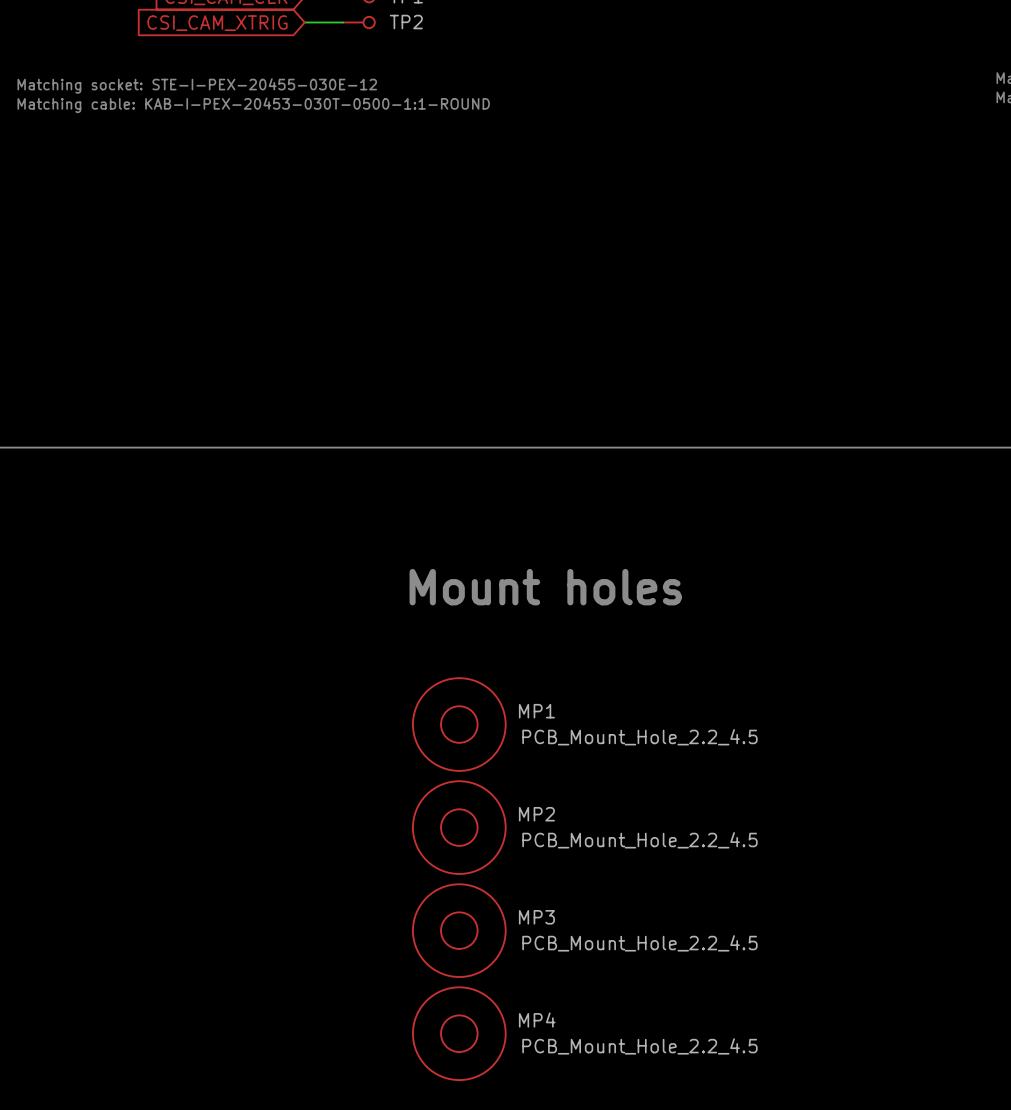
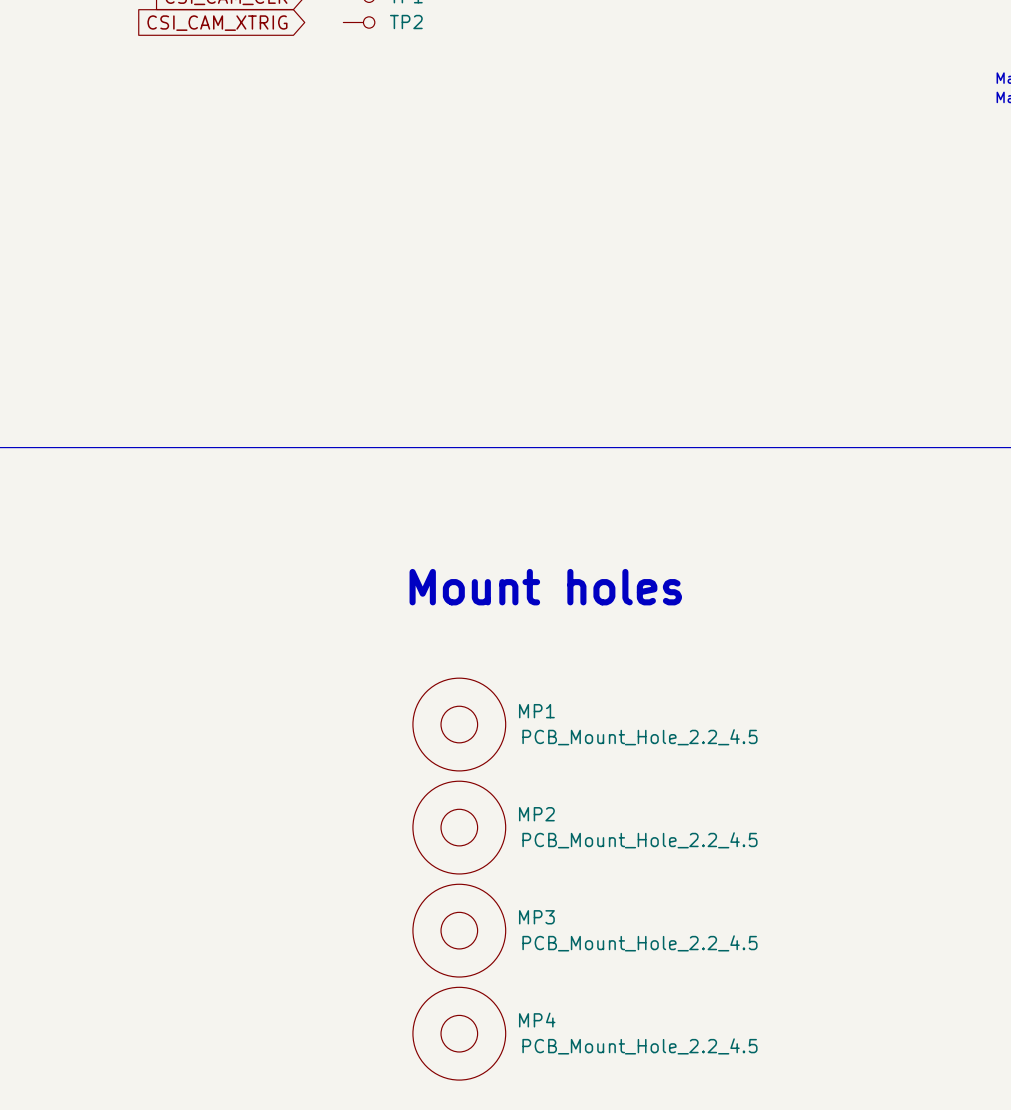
wire: (304, 22) (343, 22) -> none
text: Matching socket: STE-I-PEX-20455-030E-12 (197, 85) -> none
text: Matching cable: KAB-I-PEX-20453-030T-0500-1:1-ROUND (253, 105) -> none

